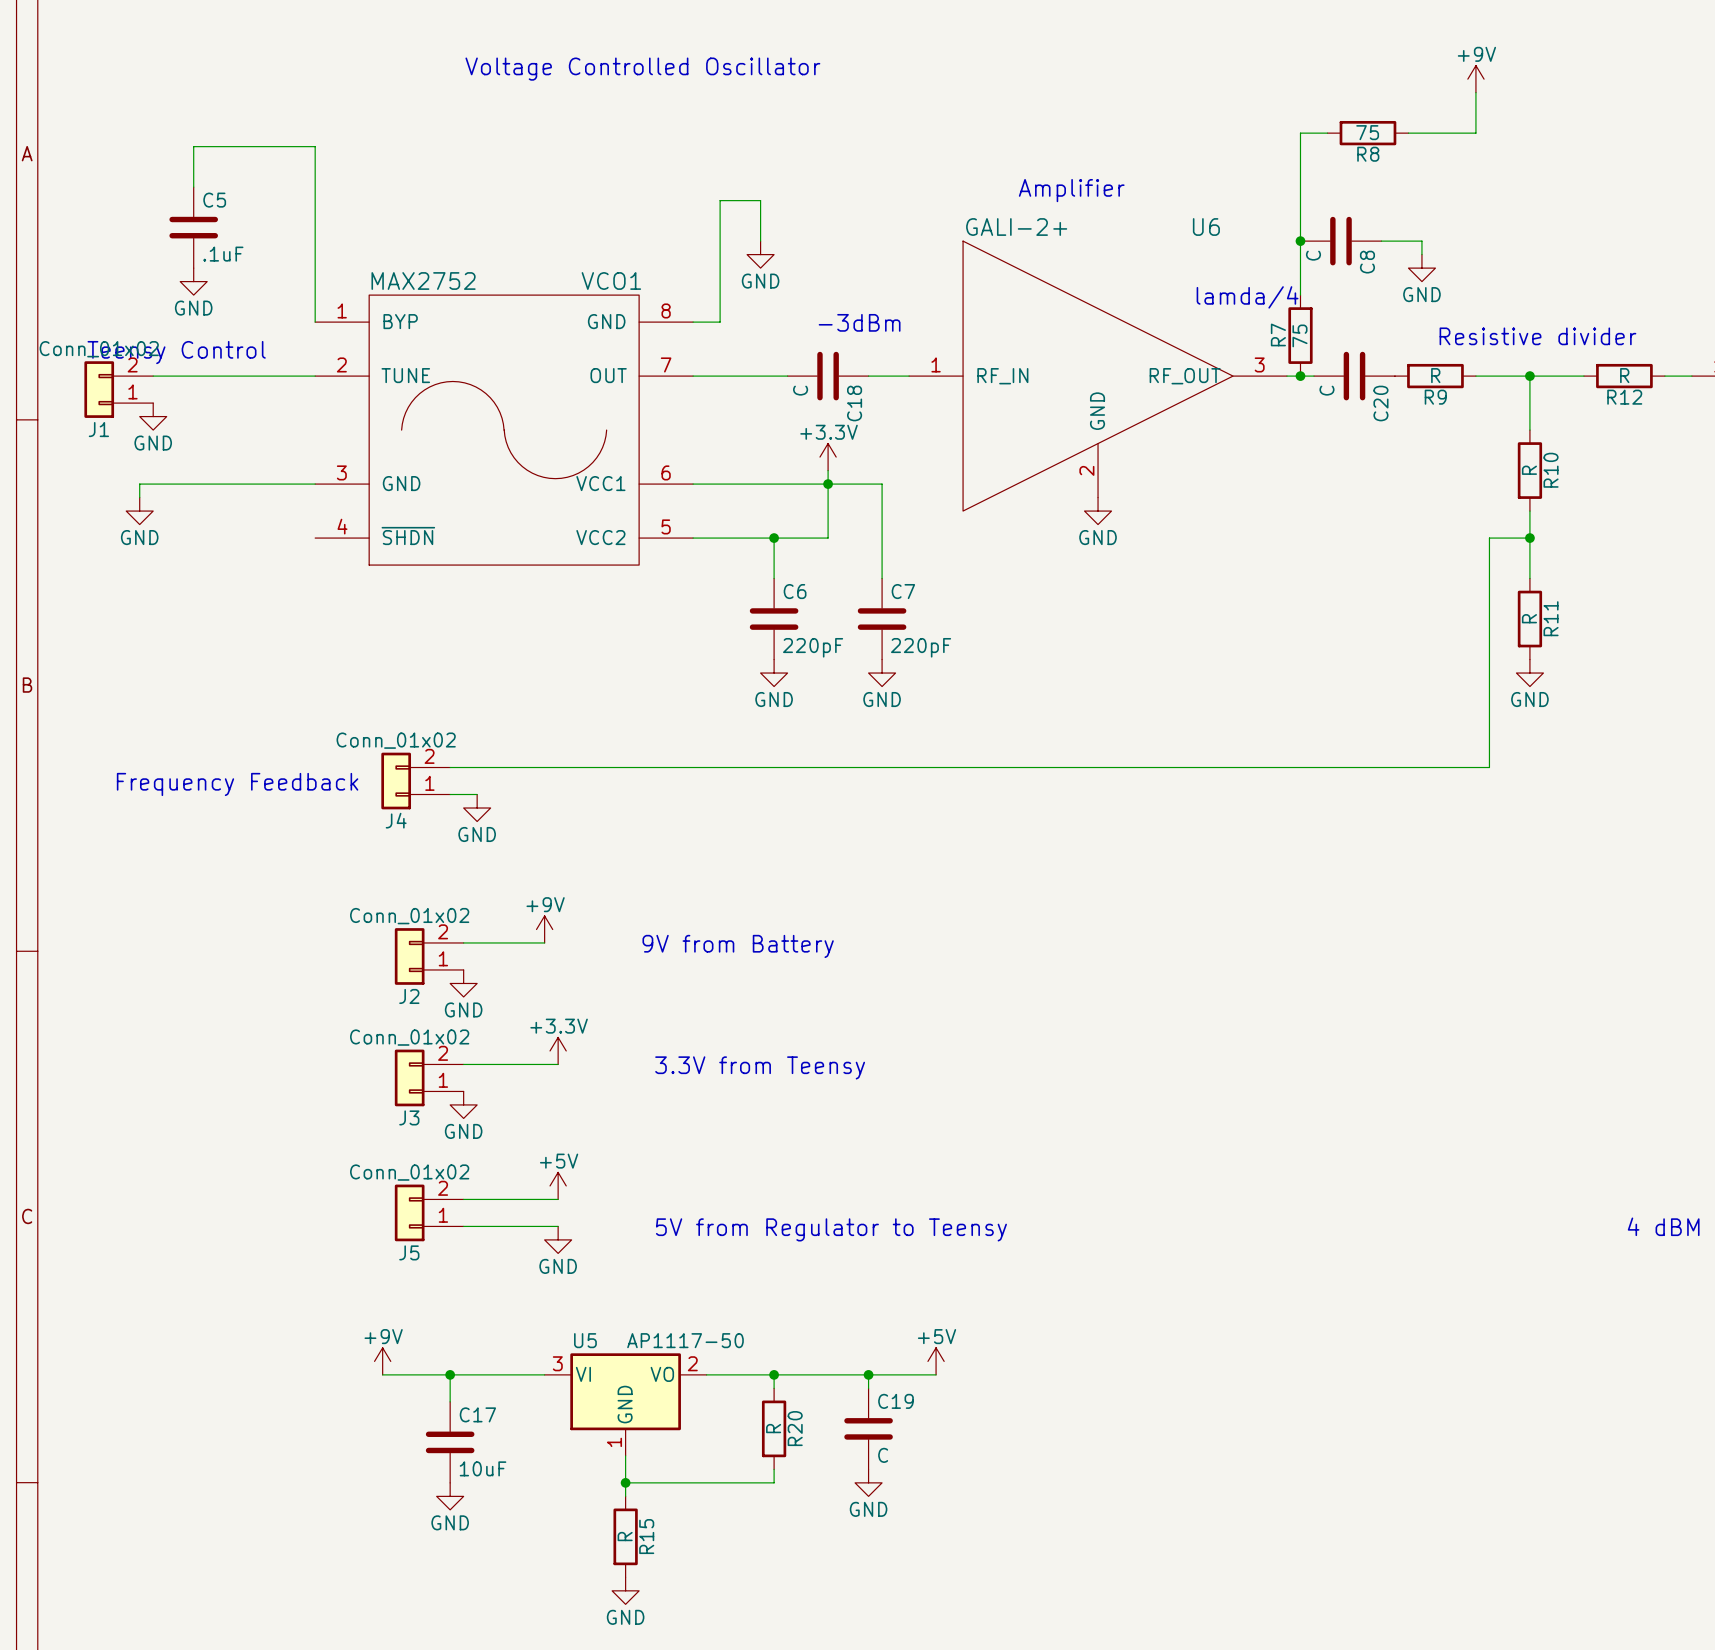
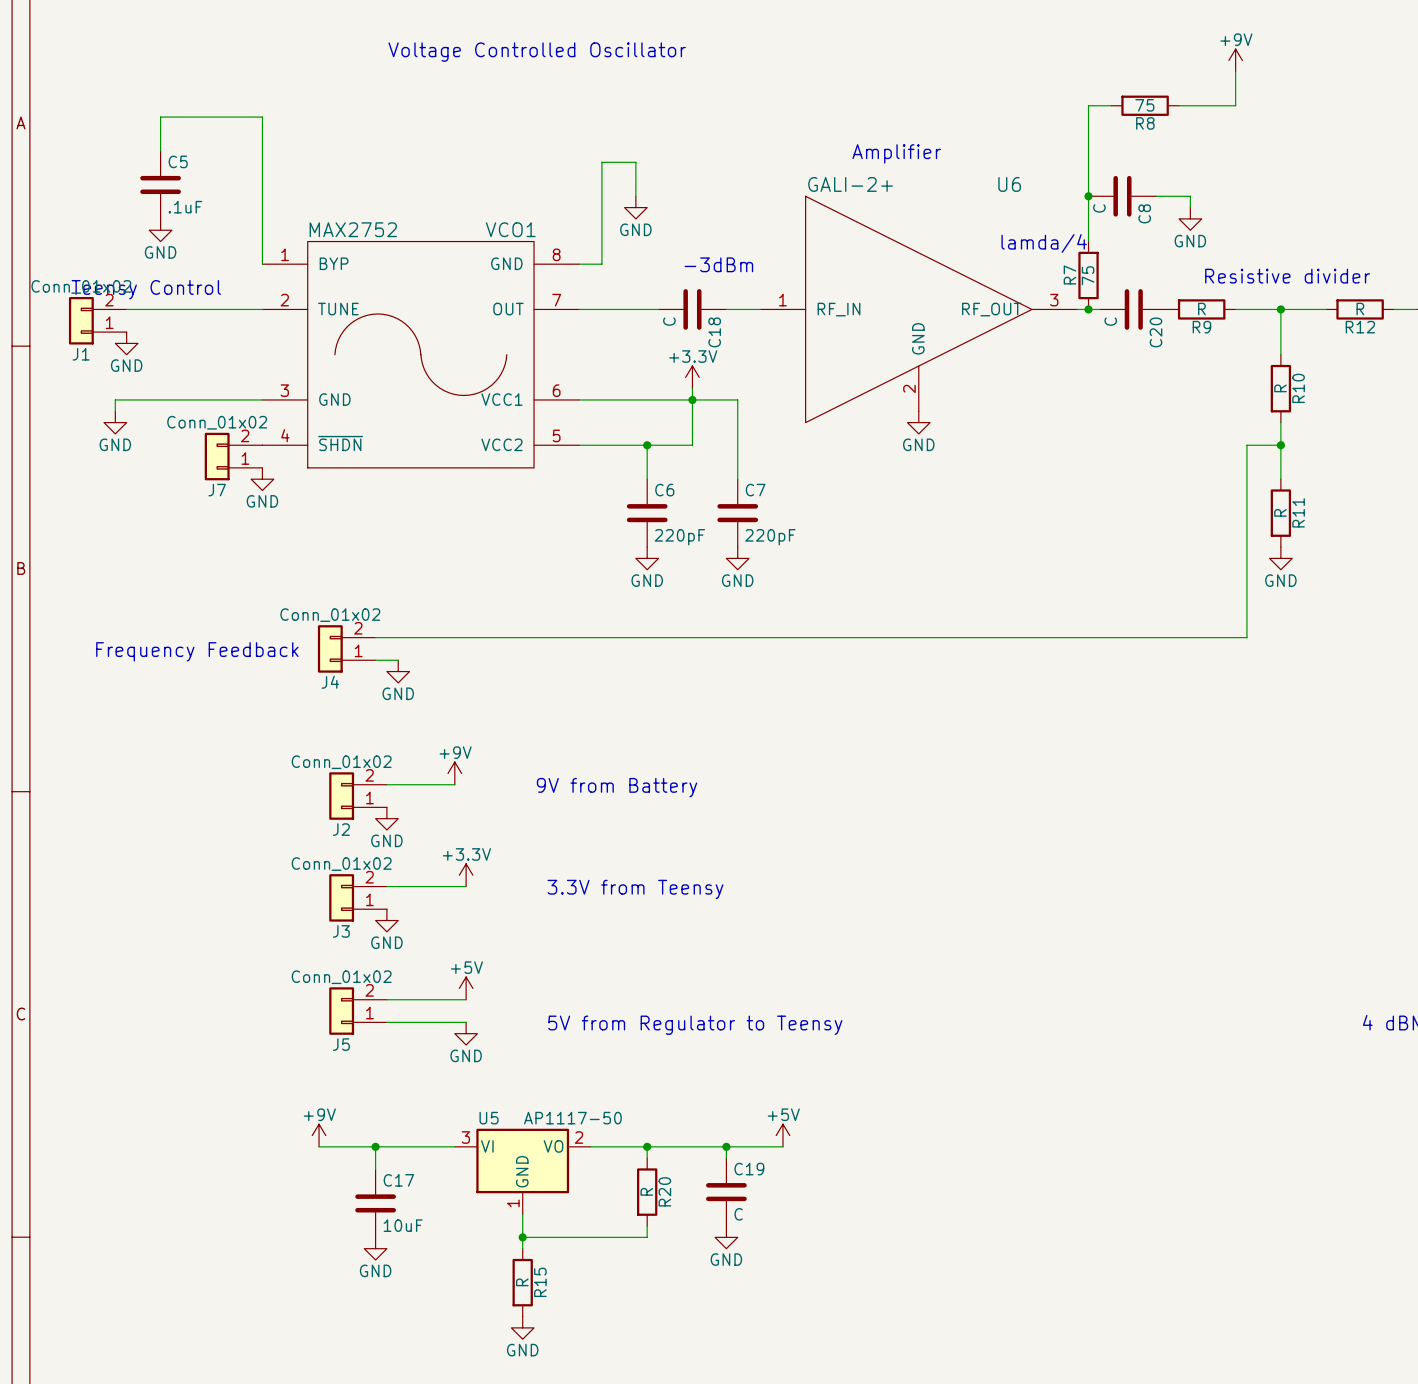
J7: none -> Conn_01x02 (233, 456)
power symbol: none -> GND (262, 479)

